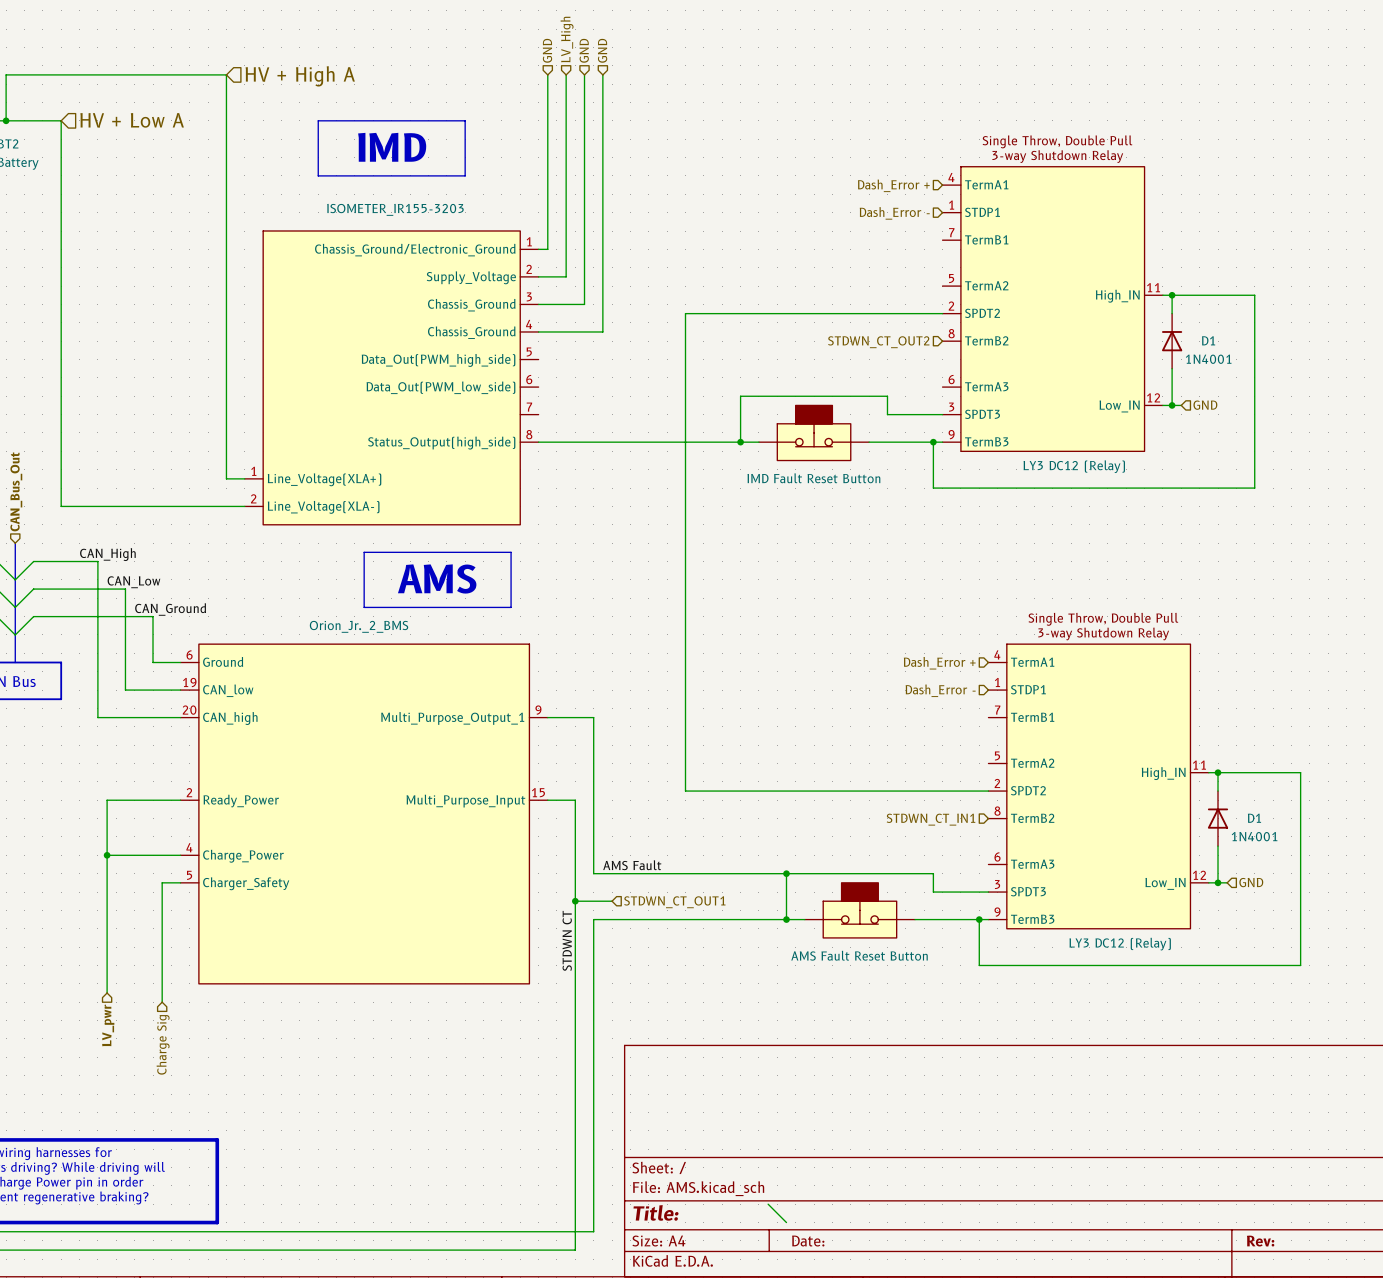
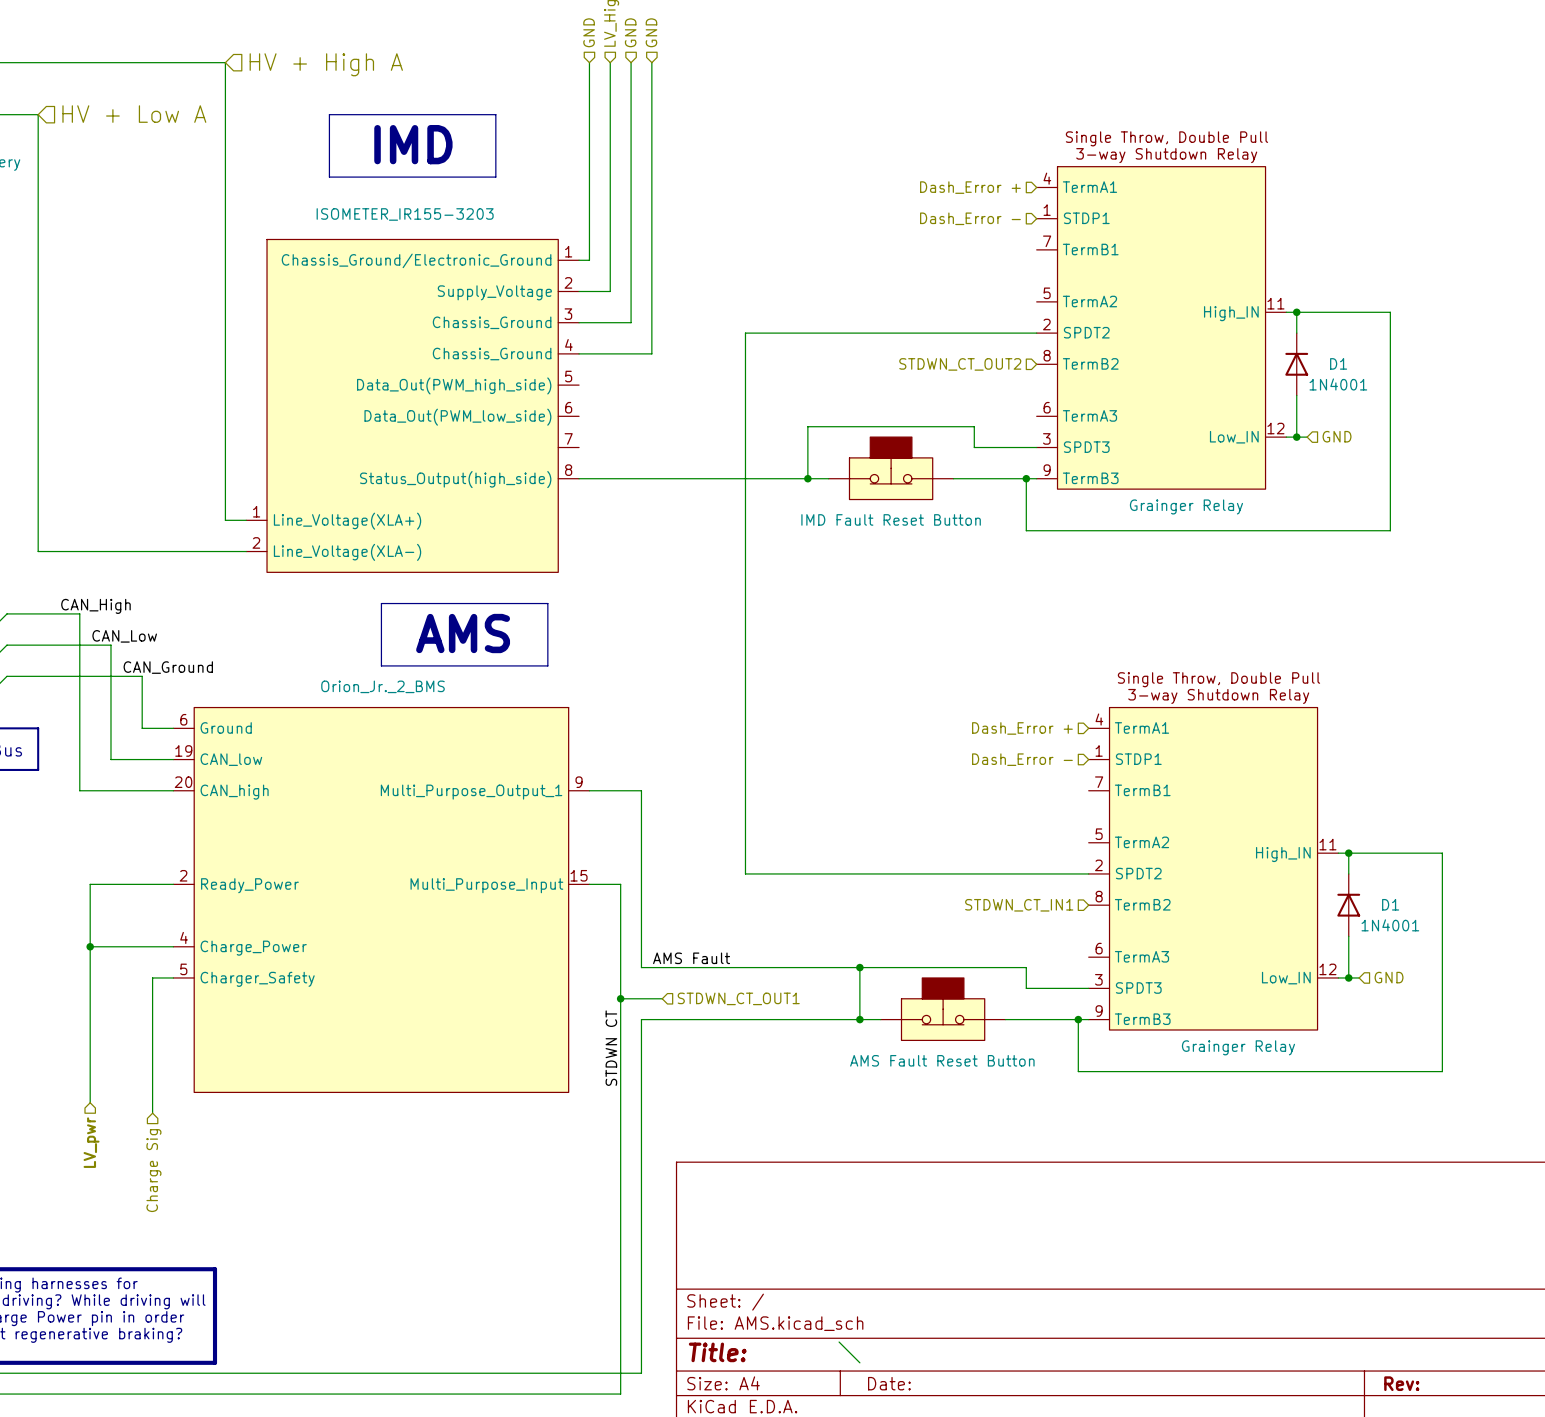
part value: LY3 DC12 (Relay) (1074, 466) -> Grainger Relay (1186, 506)
part value: LY3 DC12 (Relay) (1120, 944) -> Grainger Relay (1238, 1047)

